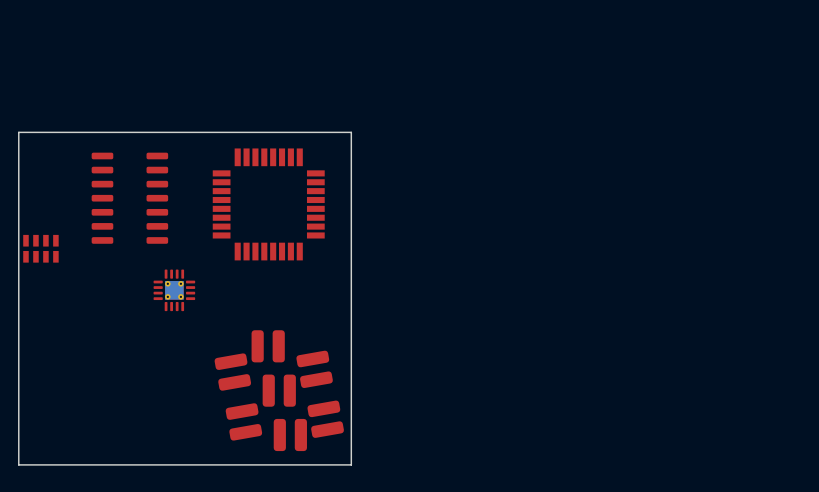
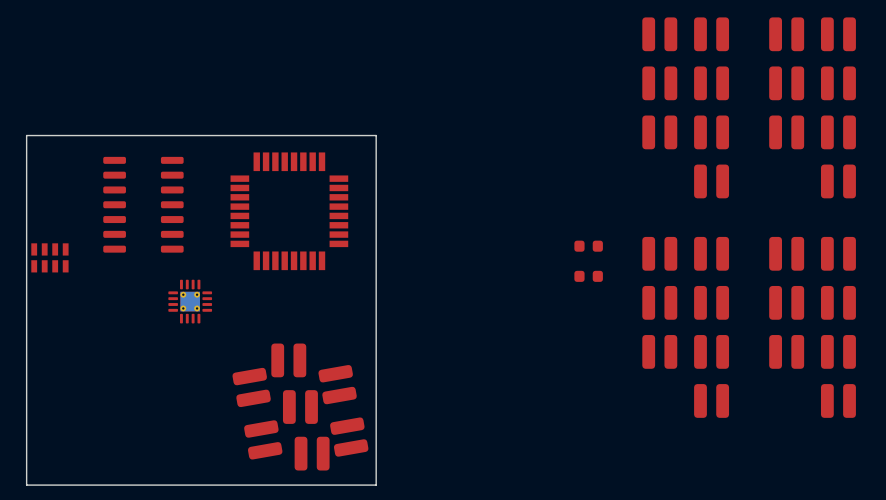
part: none -> (659, 34)
part: none -> (711, 34)
part: none -> (786, 34)
part: none -> (838, 34)
part: none -> (659, 83)
part: none -> (711, 83)
part: none -> (786, 83)
part: none -> (838, 83)
part: none -> (659, 132)
part: none -> (711, 132)
part: none -> (786, 132)
part: none -> (838, 132)
part: none -> (711, 181)
part: none -> (838, 181)
part: none -> (588, 246)
part: none -> (659, 253)
part: none -> (711, 253)
part: none -> (786, 253)
part: none -> (838, 253)
part: none -> (588, 276)
part: none -> (659, 302)
part: none -> (711, 302)
part: none -> (786, 302)
part: none -> (838, 302)
part: none -> (659, 351)
part: none -> (711, 351)
part: none -> (786, 351)
part: none -> (838, 351)
part: none -> (711, 400)
part: none -> (838, 400)

